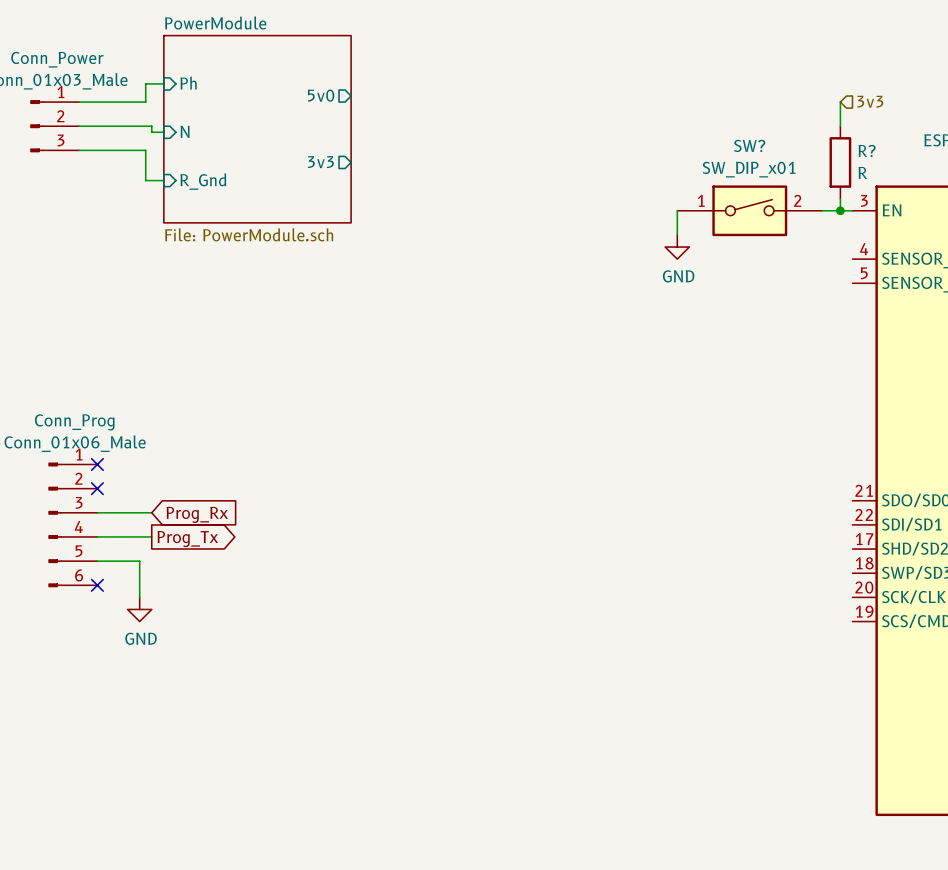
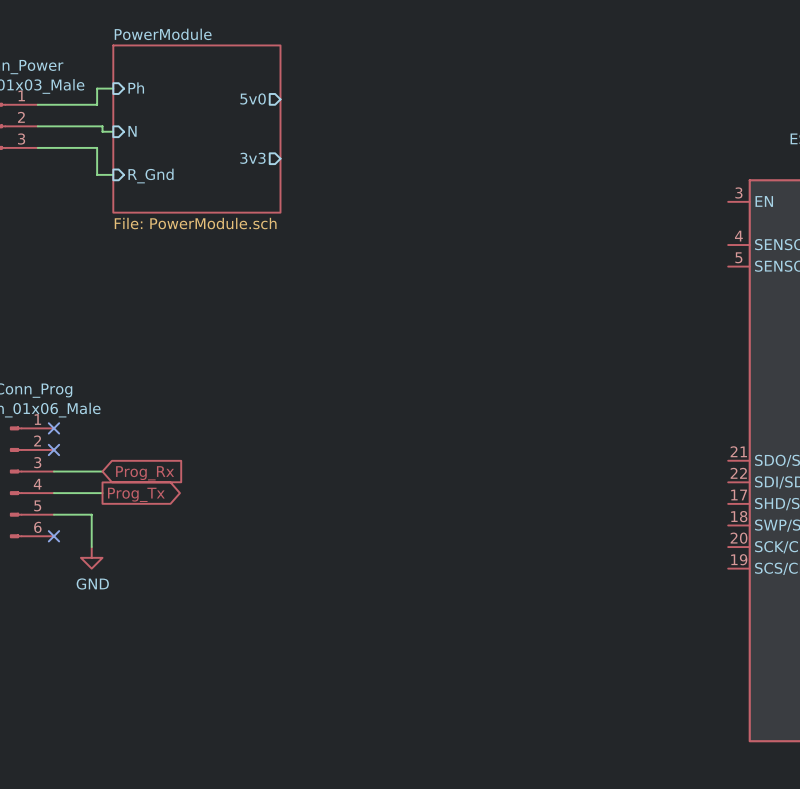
hierarchical label: 3v3 (870, 101) -> none
wire: (840, 102) (840, 126) -> none
R?: R (840, 162) -> none
wire: (840, 198) (840, 210) -> none
wire: (677, 210) (677, 234) -> none
SW?: SW_DIP_x01 (749, 210) -> none
wire: (822, 210) (852, 210) -> none
junction: (840, 210) -> none
power symbol: GND (677, 247) -> none

